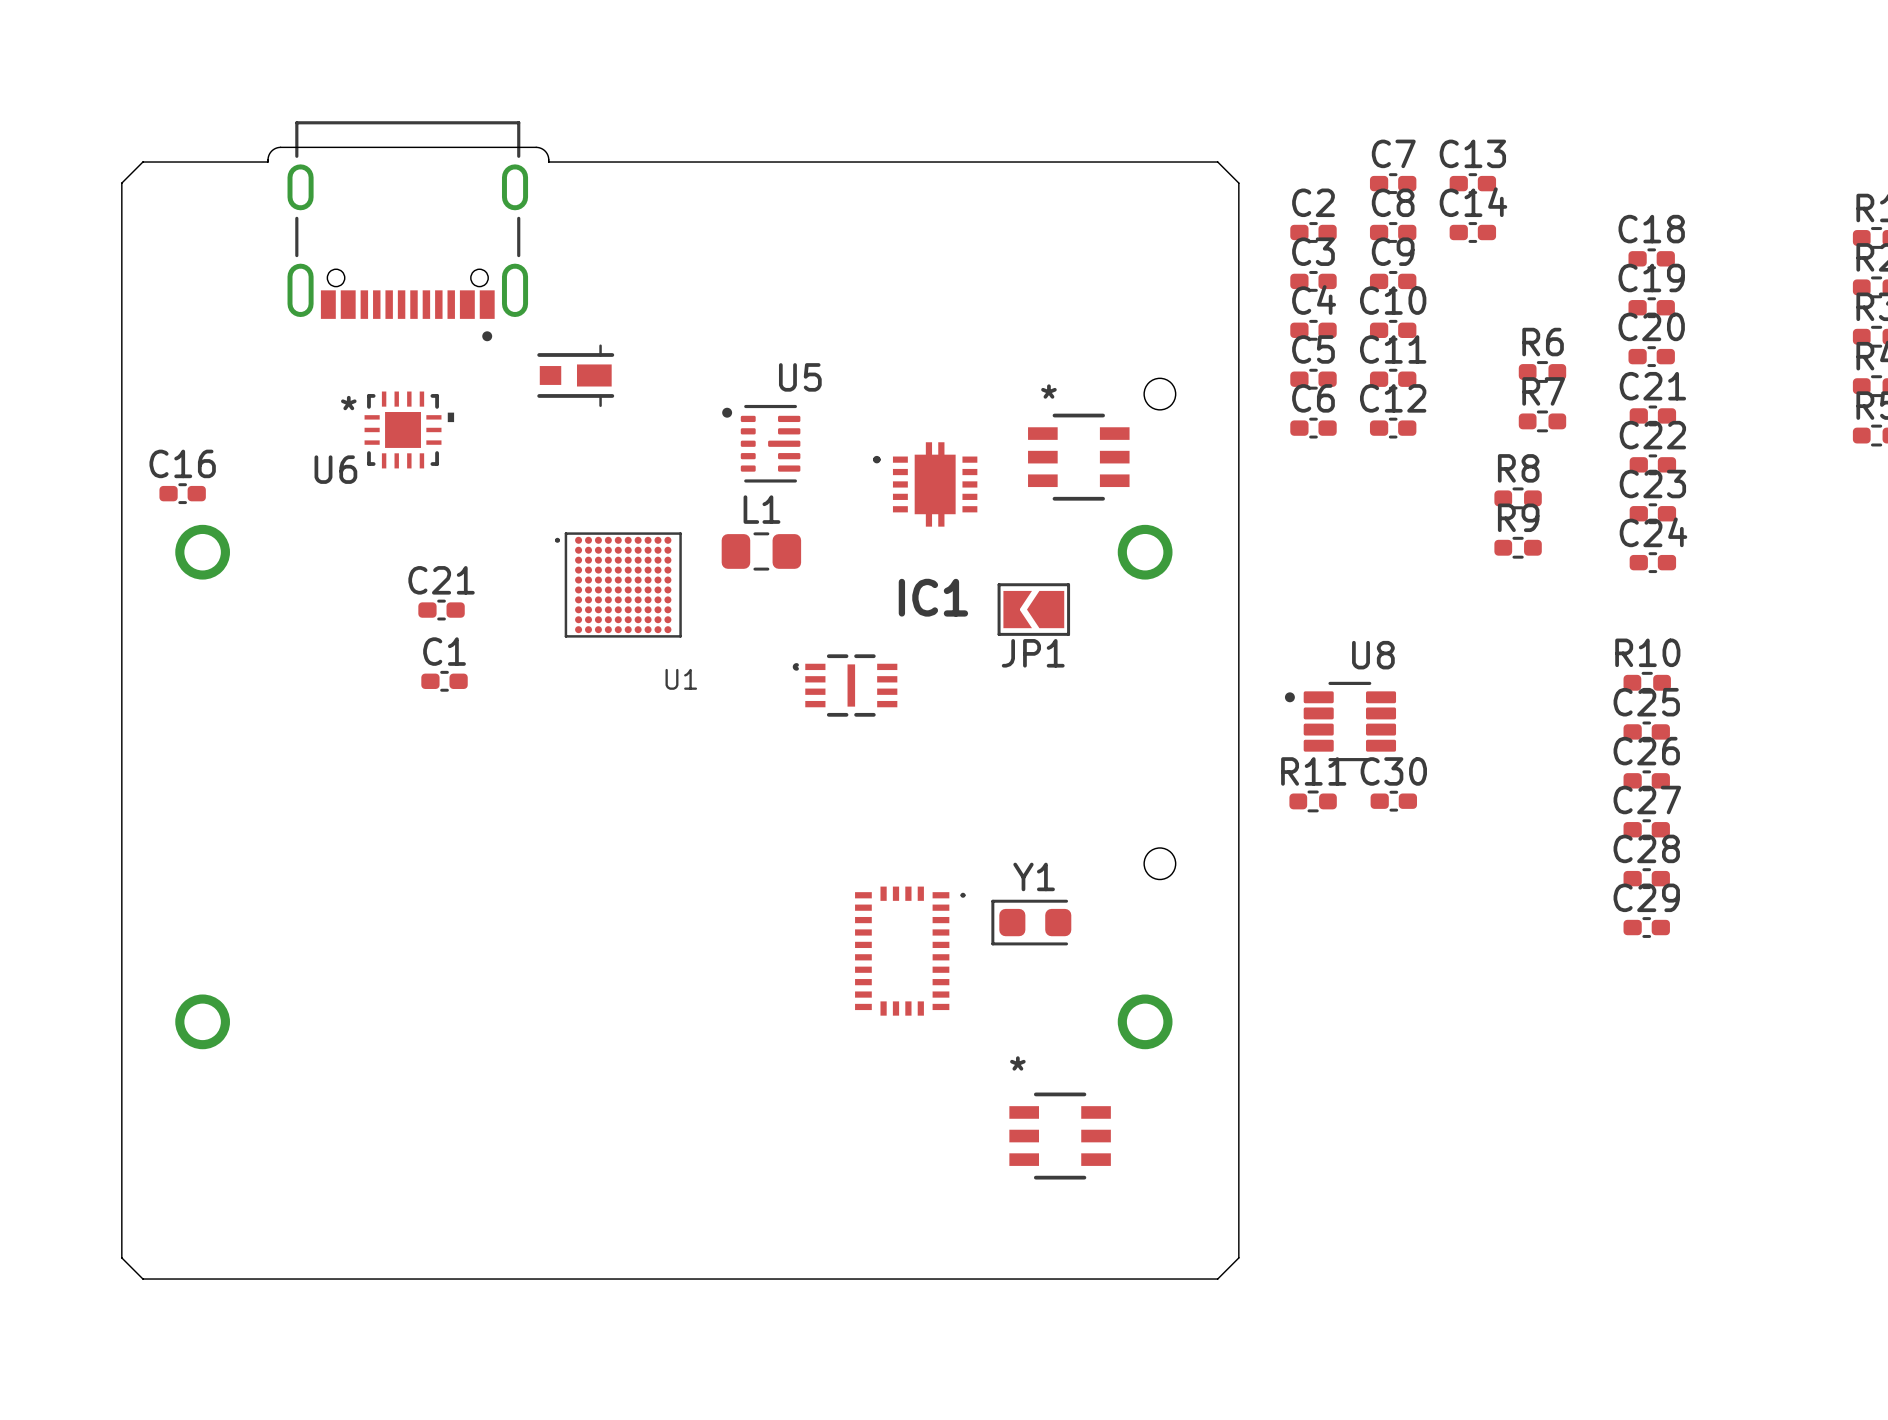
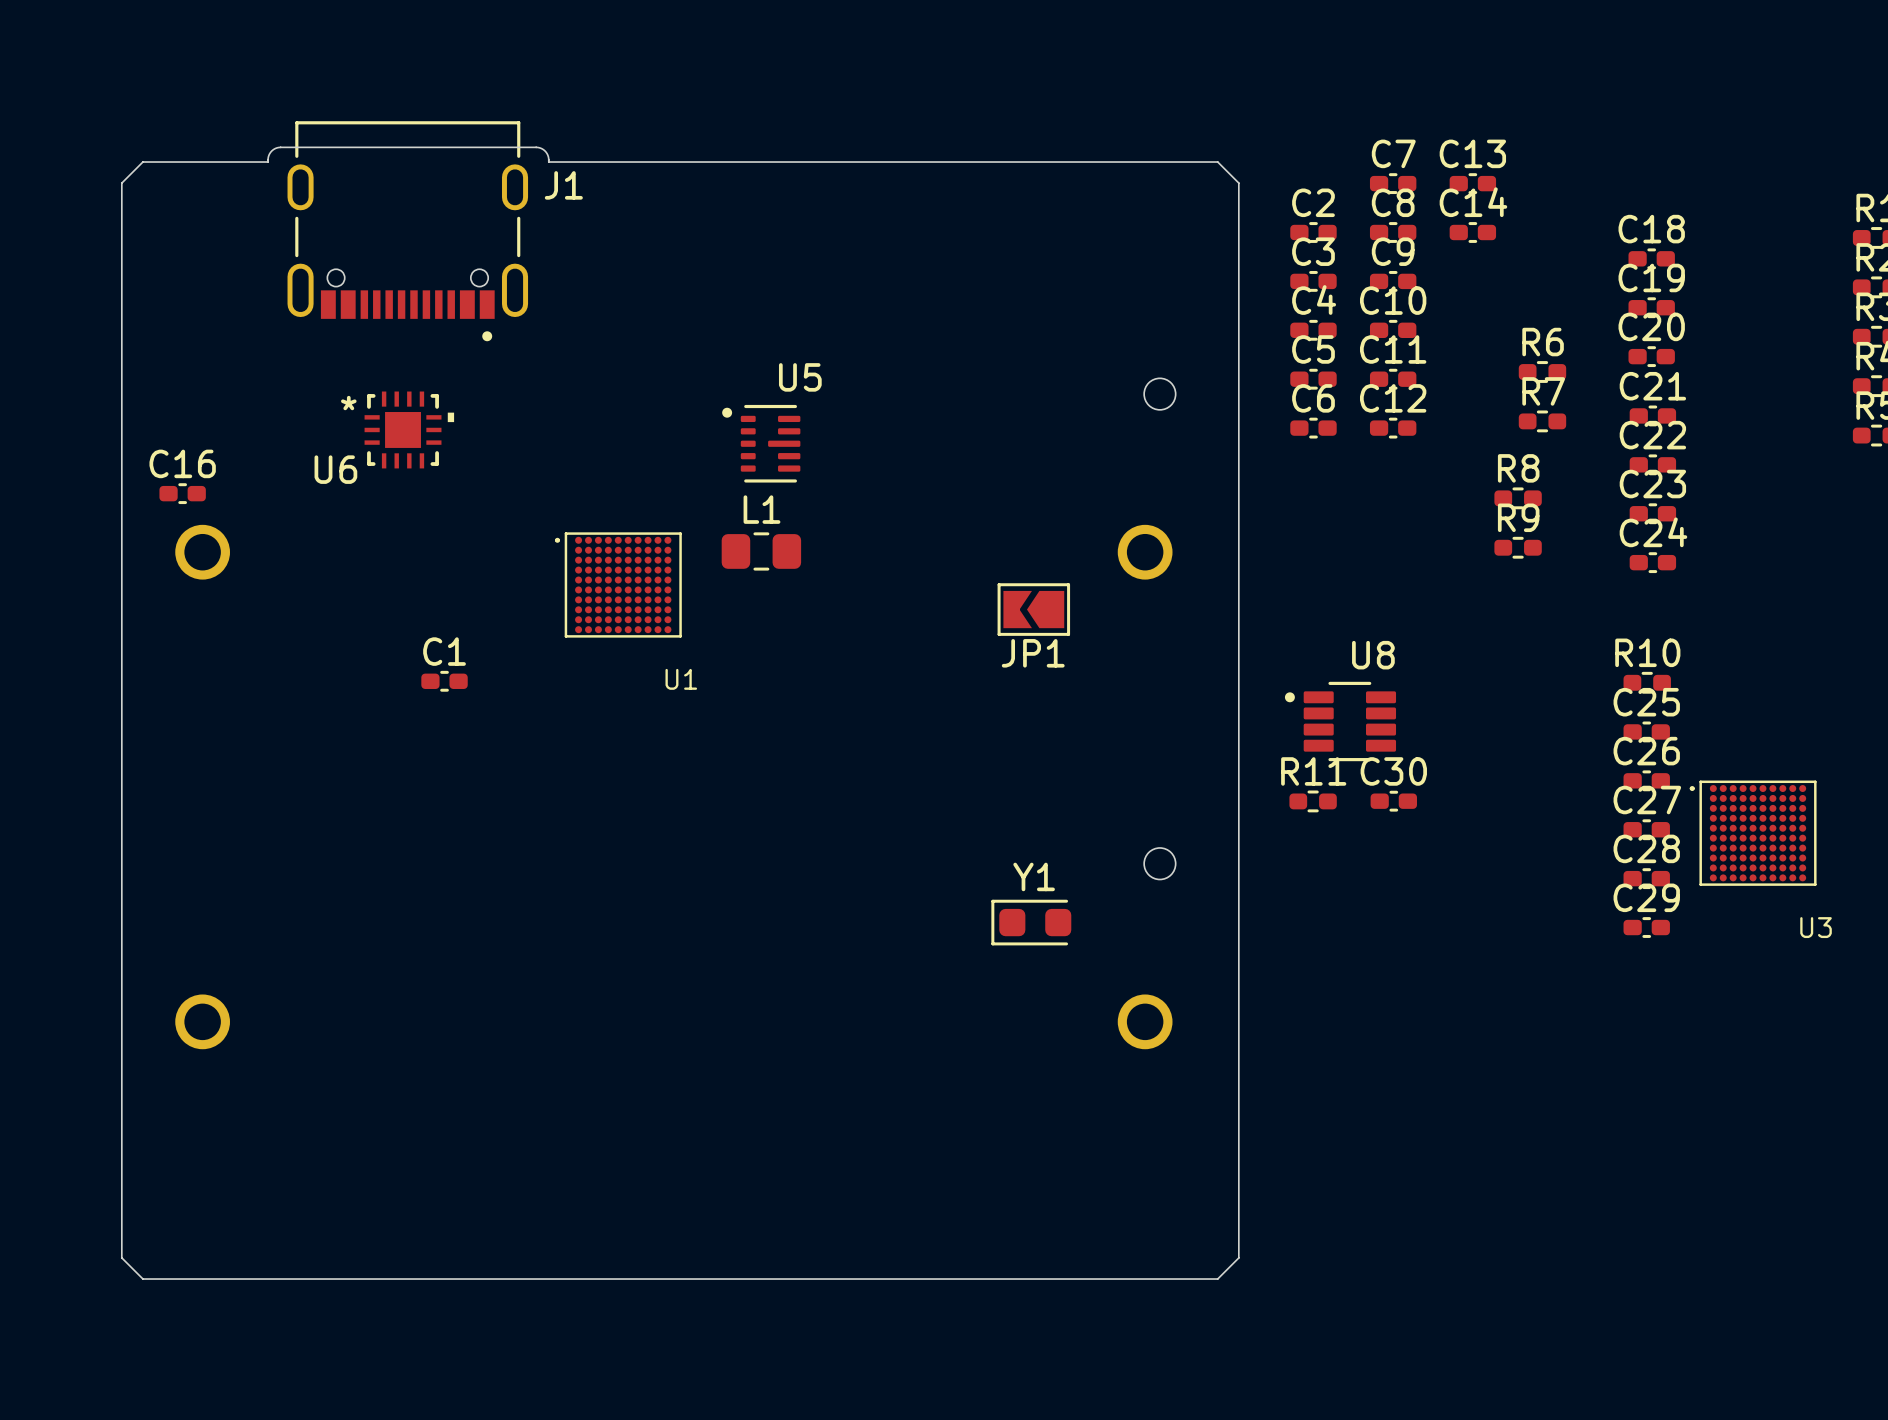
J1 name: none -> J1 (563, 185)
part: (575, 375) -> none
part: (1078, 457) -> none
IC1: (925, 484) -> none
C21: (441, 610) -> none
part: (845, 685) -> none
U3: none -> (1753, 833)
part: (910, 951) -> none
part: (1060, 1136) -> none

